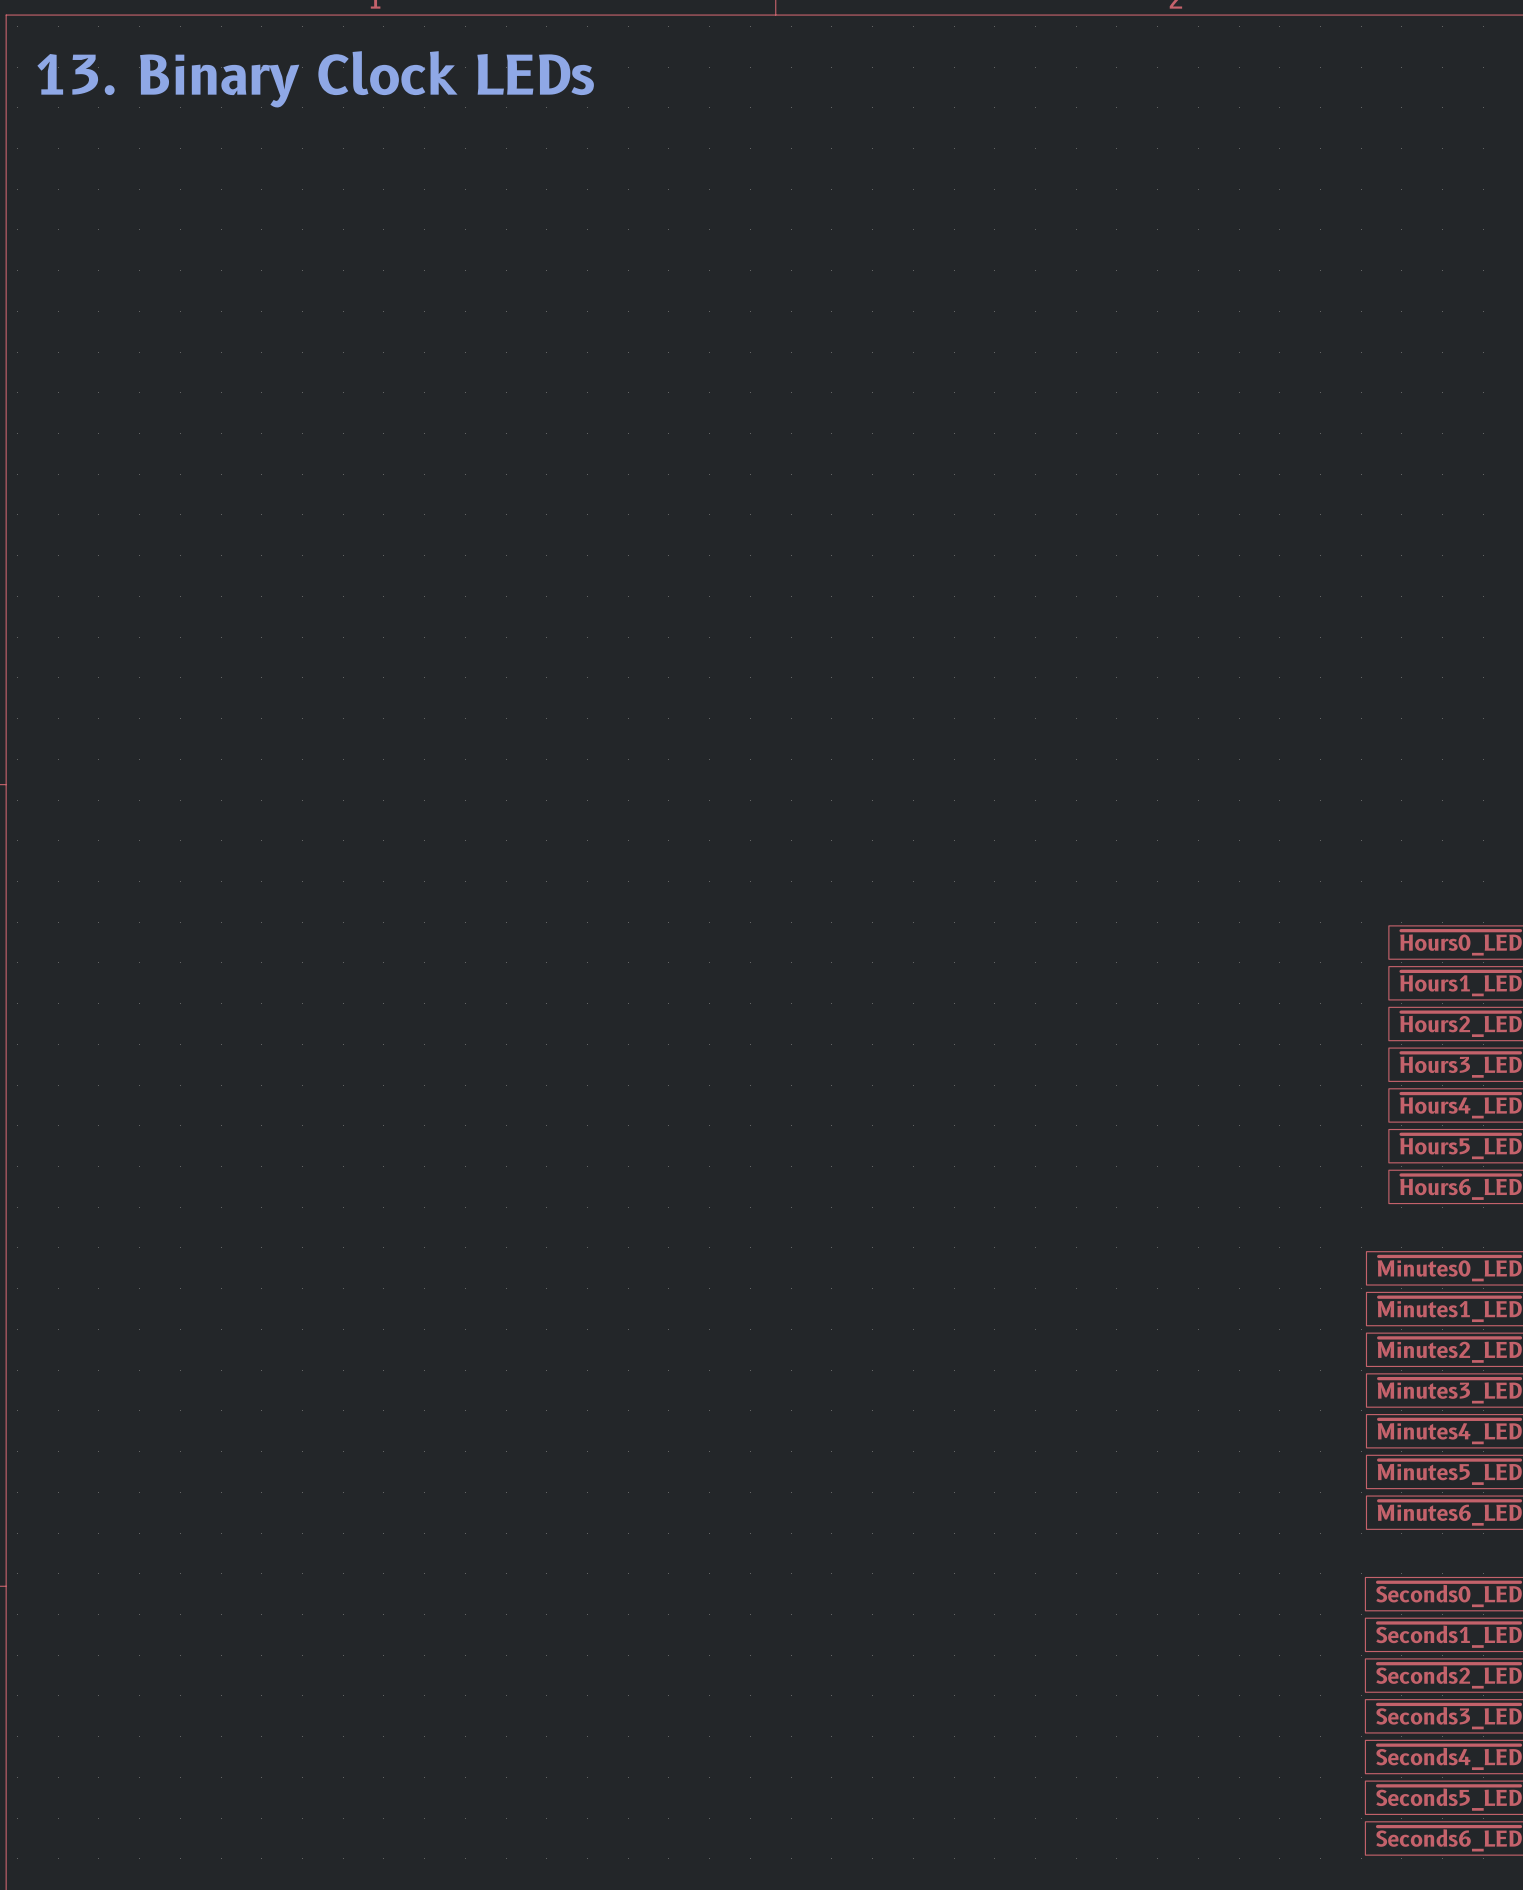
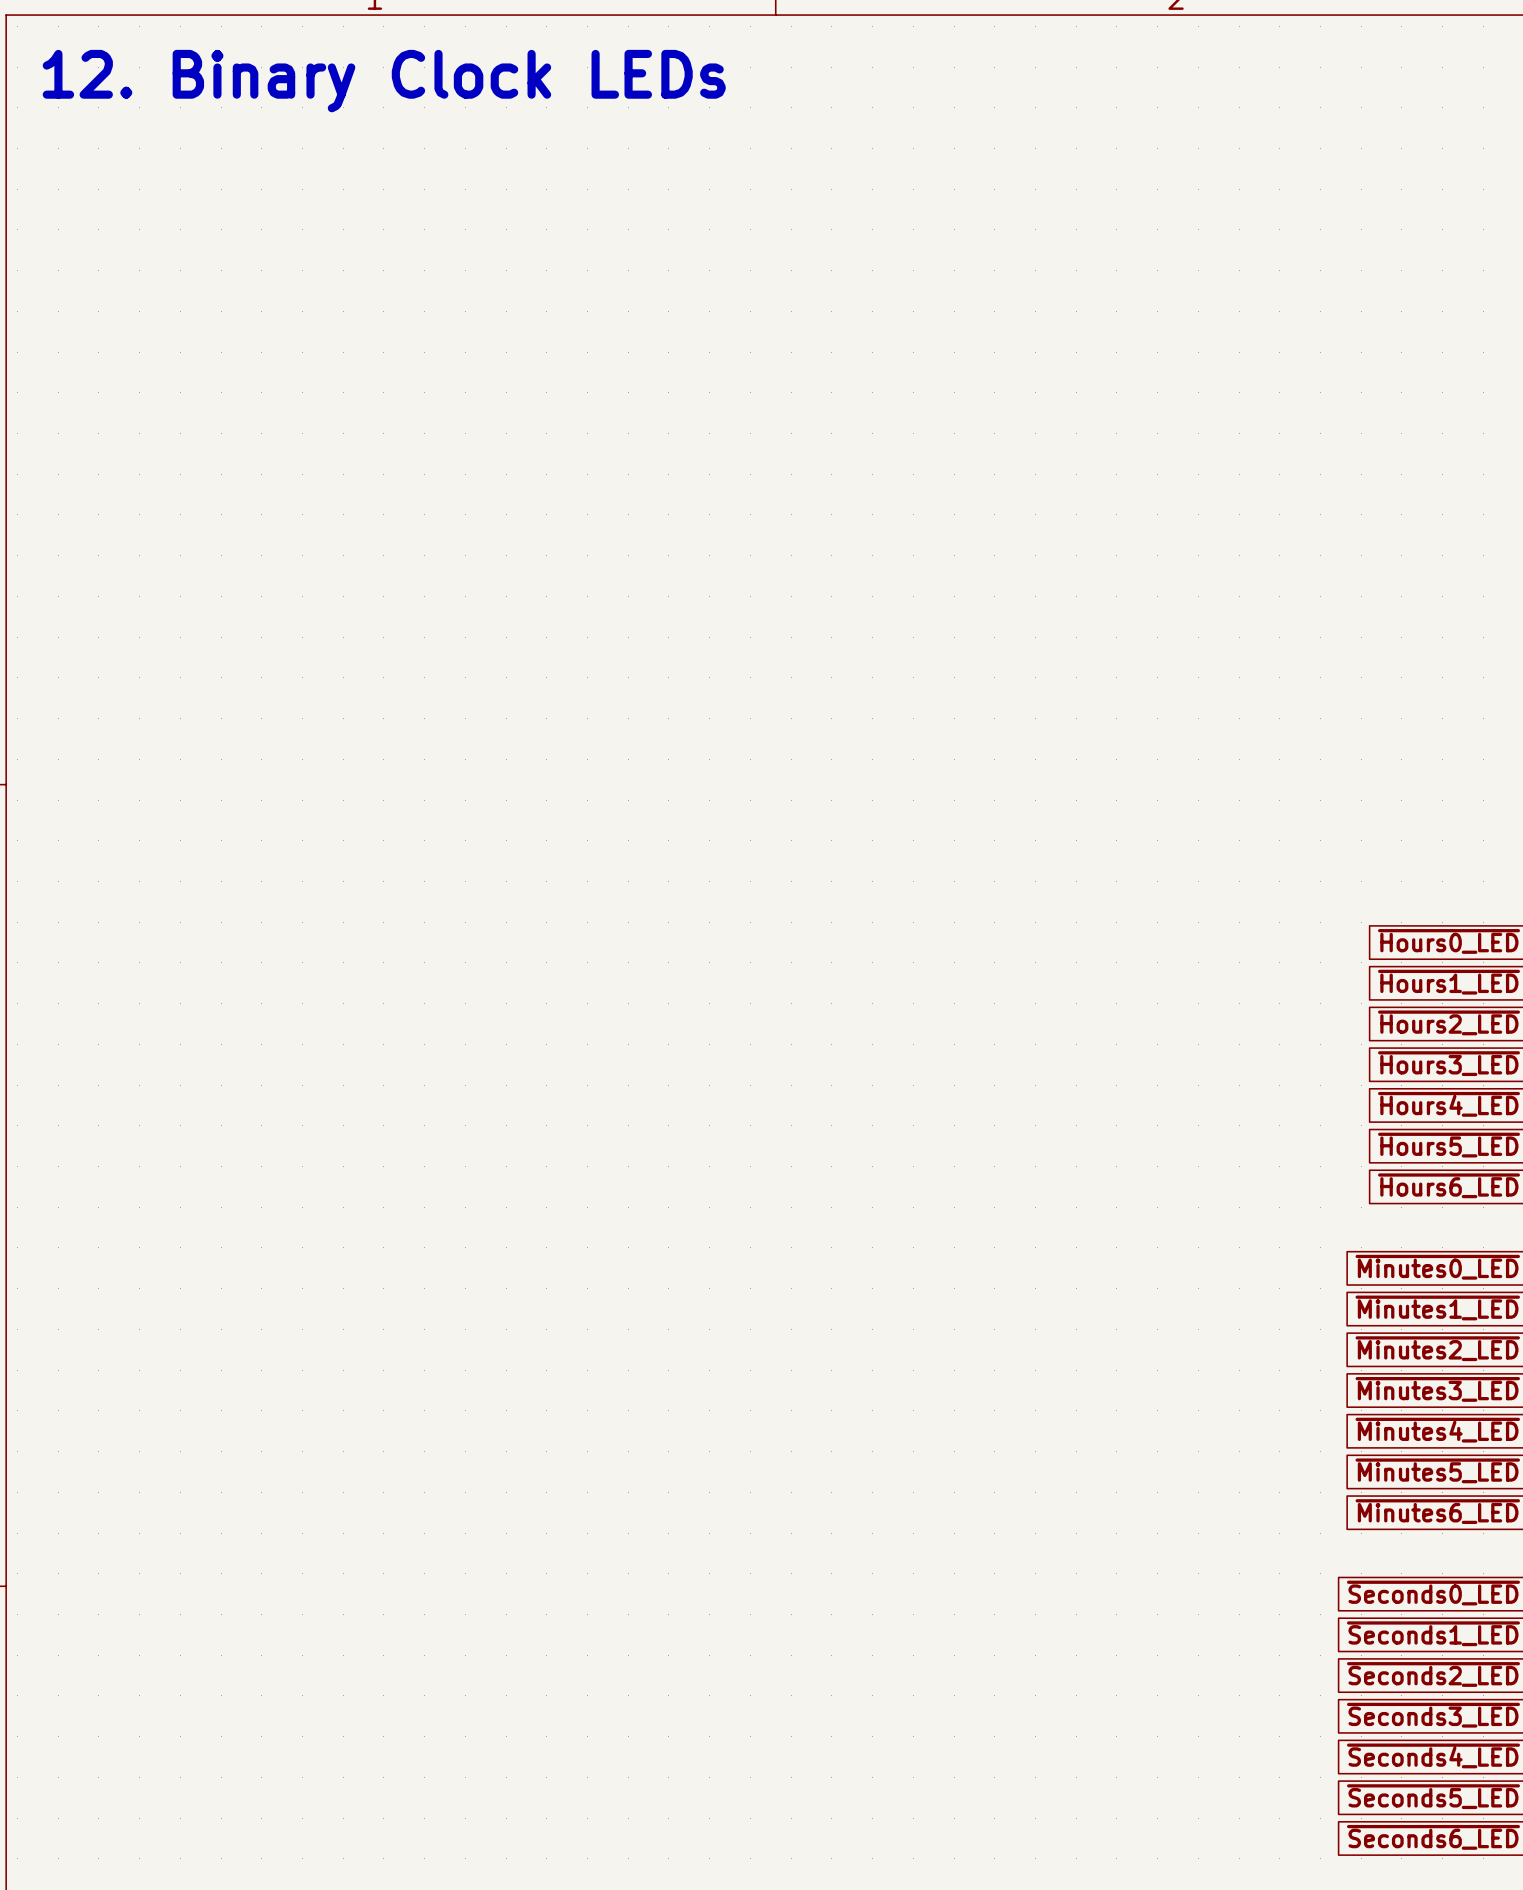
text: 13. Binary Clock LEDs (315, 79) -> 12. Binary Clock LEDs (384, 81)

